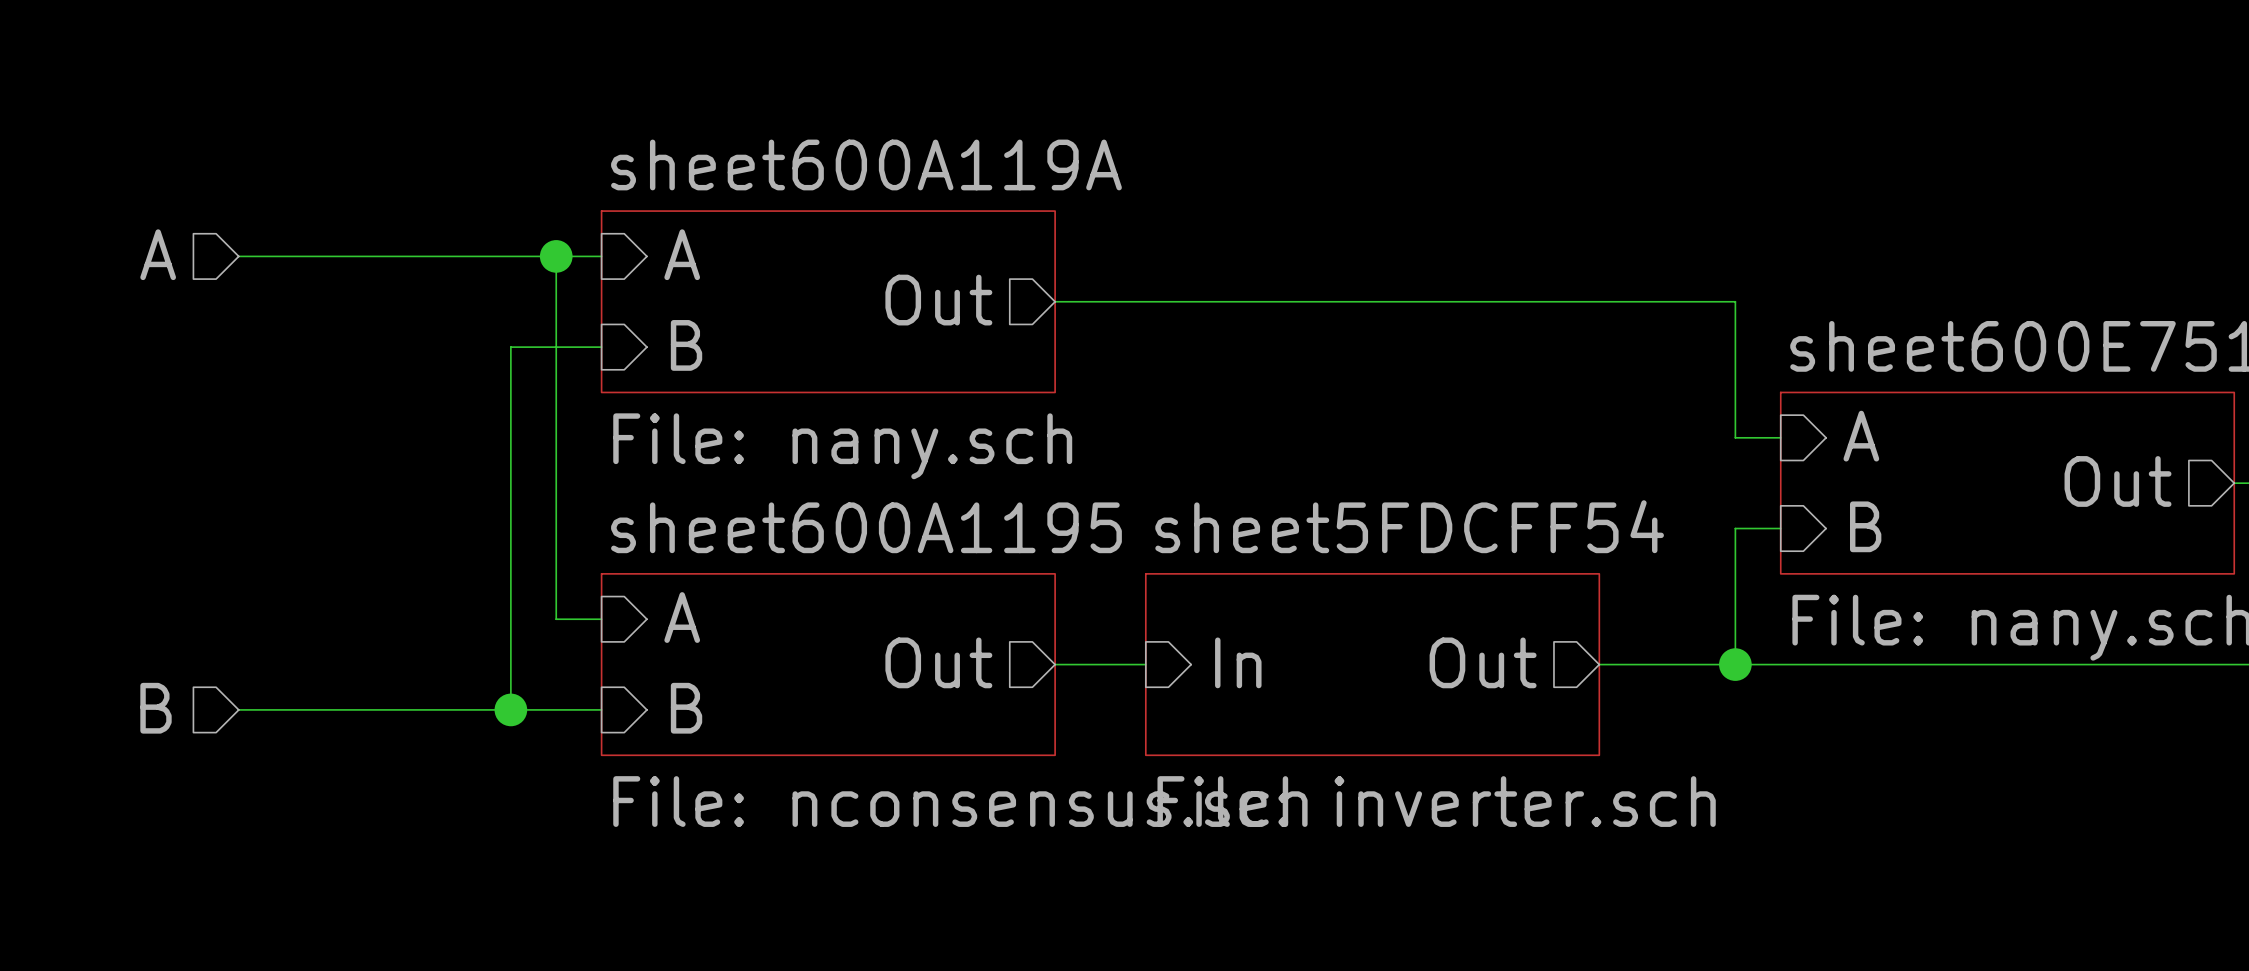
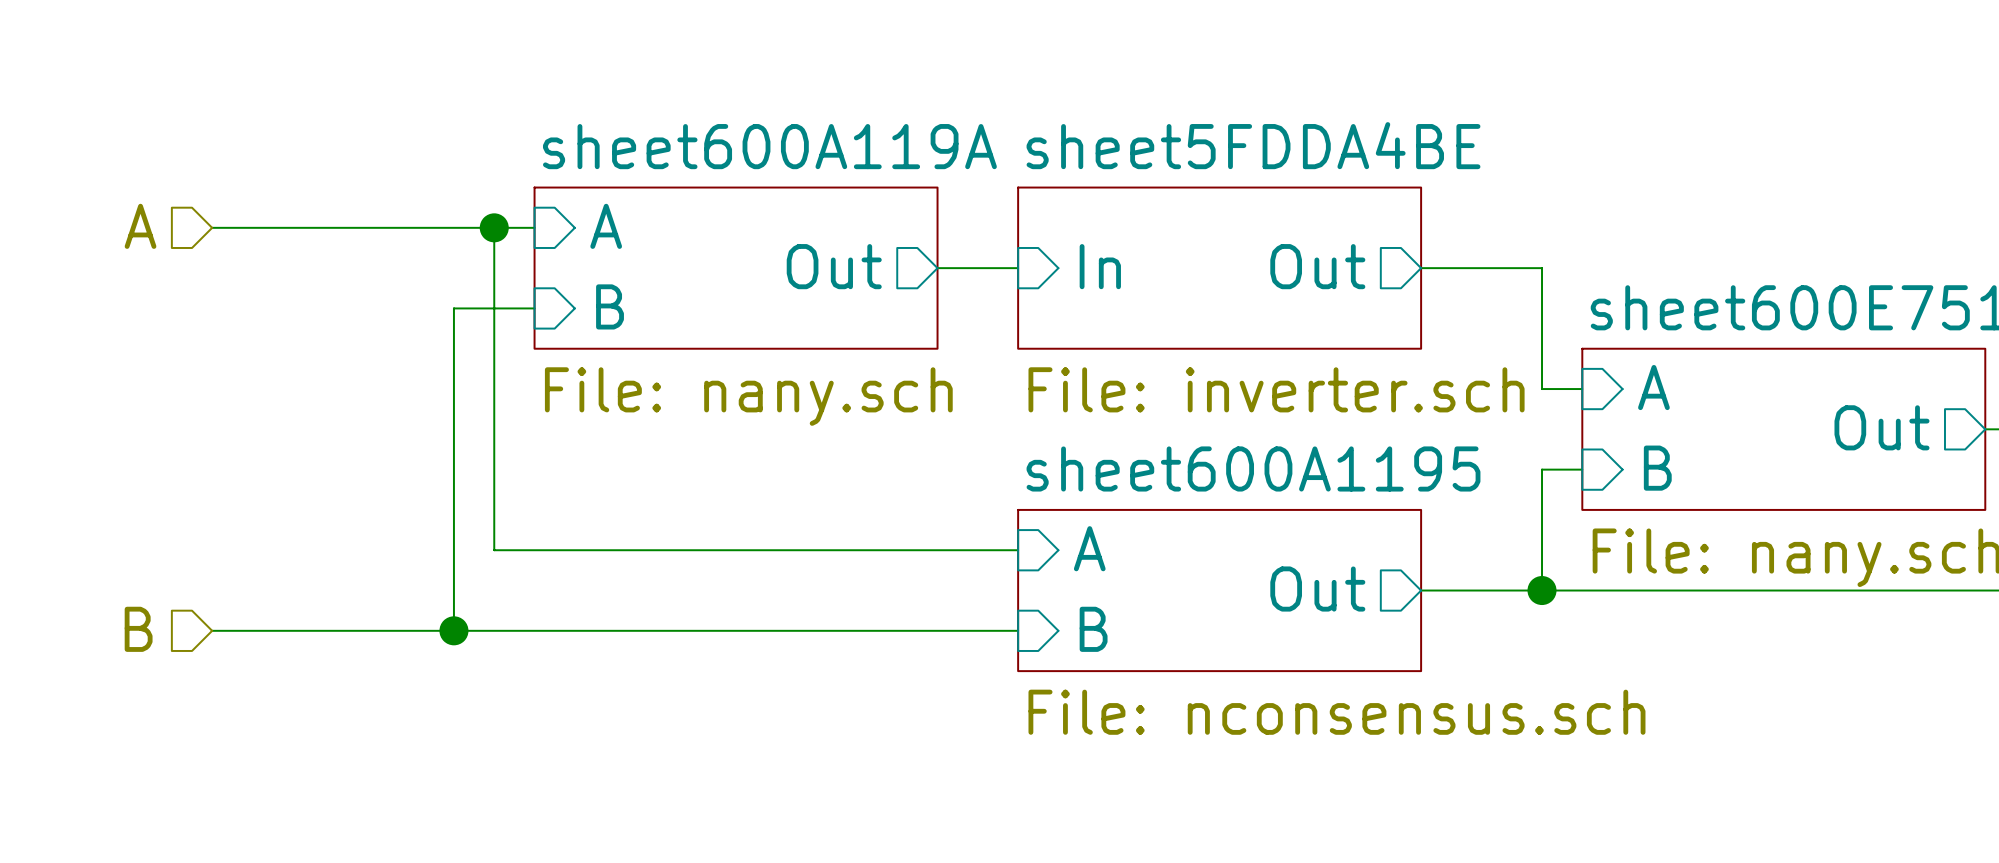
wire: (1145, 301) (1599, 301) -> none
sheet sheet5FDDA4BE: none -> File: inverter.sch (1219, 268)
sheet sheet5FDCFF54 name: sheet5FDCFF54 (1409, 526) -> sheet600A1195 (1253, 468)
sheet pin position: A (682, 617) -> A (1089, 548)
wire: none -> (534, 550) (1018, 550)
sheet pin position: Out (938, 662) -> Out (1317, 266)
sheet pin position: In (1238, 662) -> In (1100, 266)
sheet sheet600A1195: File: nconsensus.sch (828, 664) -> none
wire: (1055, 664) (1145, 664) -> none
sheet pin position: B (686, 708) -> B (1093, 629)
wire: none -> (534, 630) (1018, 630)
sheet sheet5FDCFF54 value: File: inverter.sch (1436, 801) -> File: nconsensus.sch (1336, 712)

